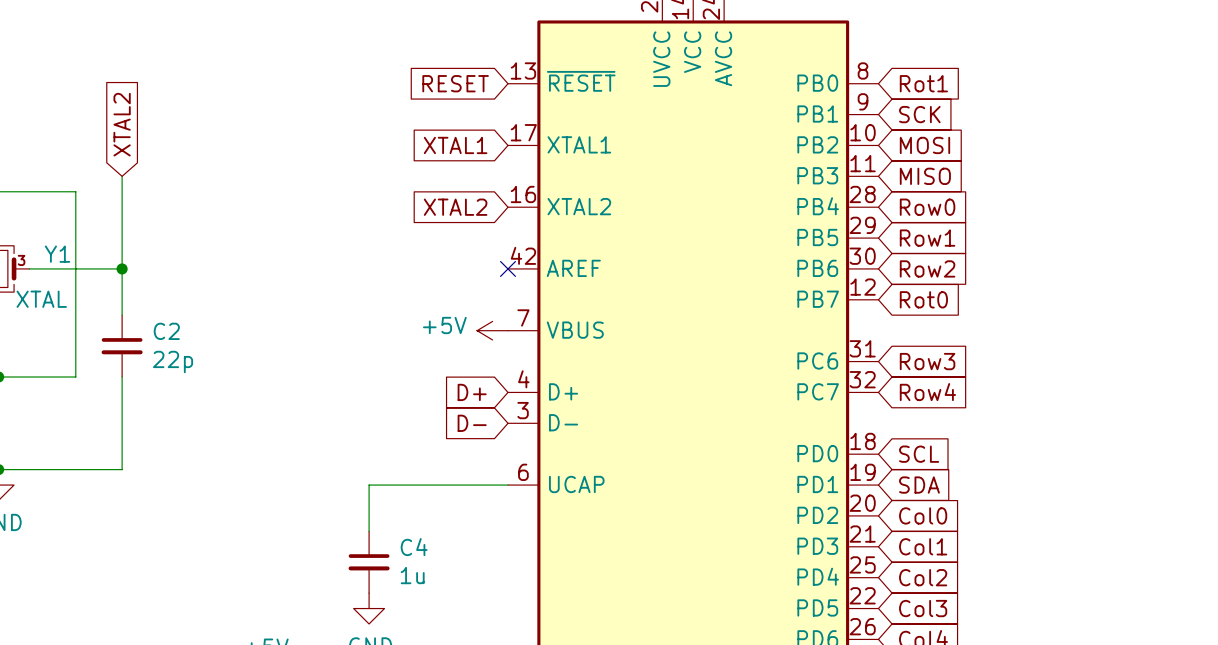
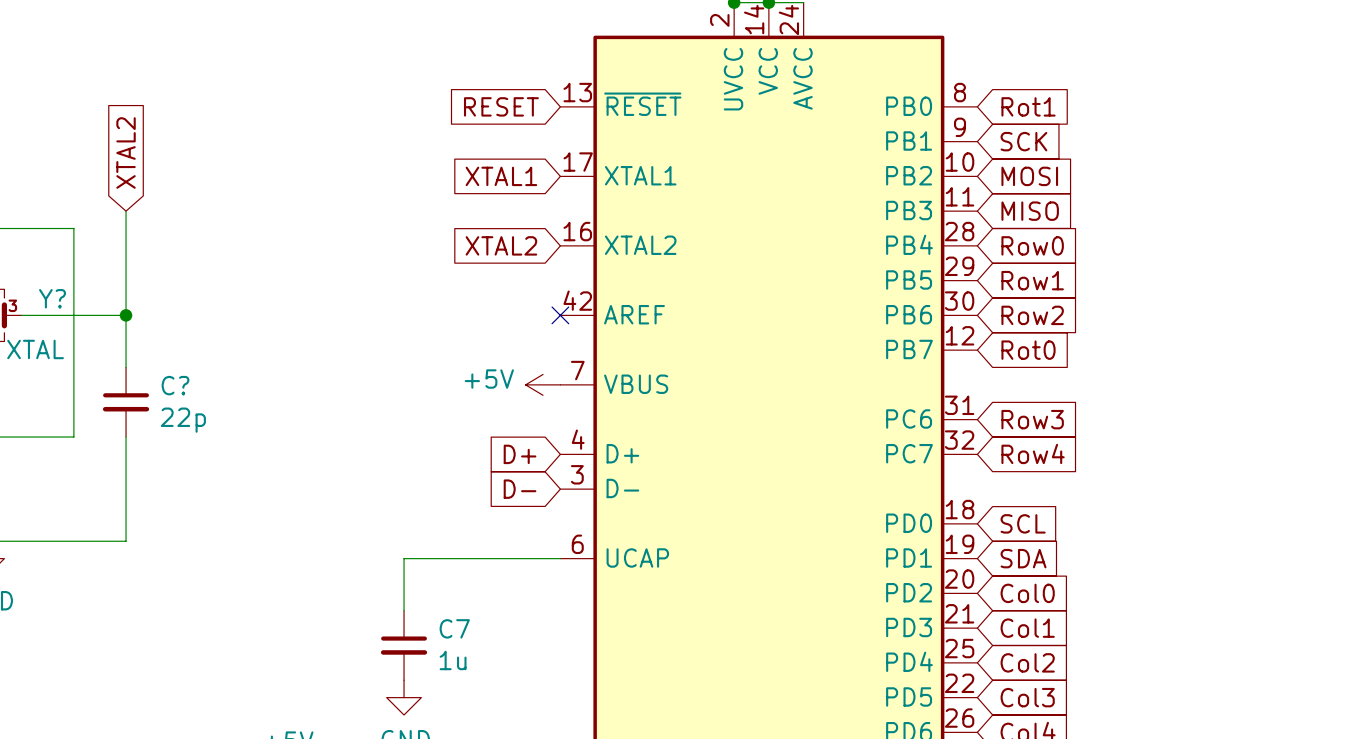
Y1 name: Y1 (57, 254) -> Y? (52, 298)
C2 name: C2 (166, 331) -> C? (175, 385)
C4 name: C4 (414, 547) -> C7 (454, 628)

